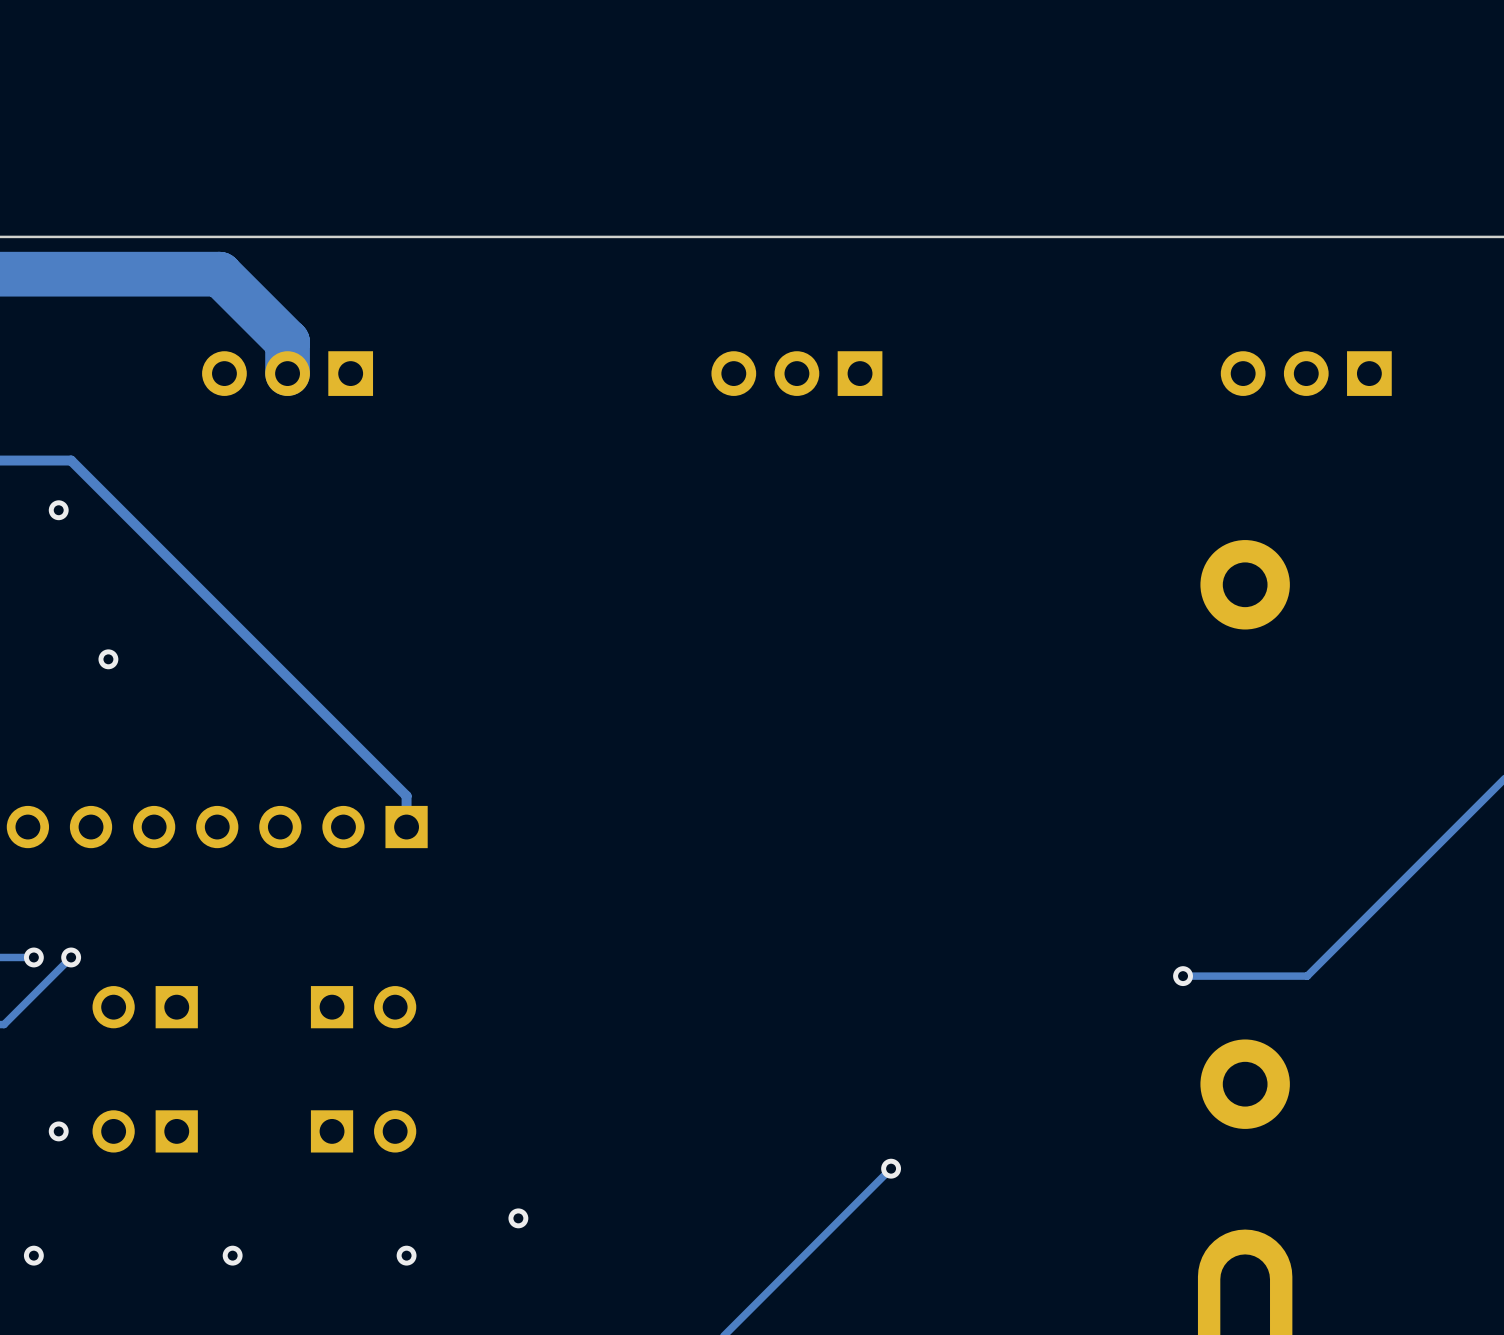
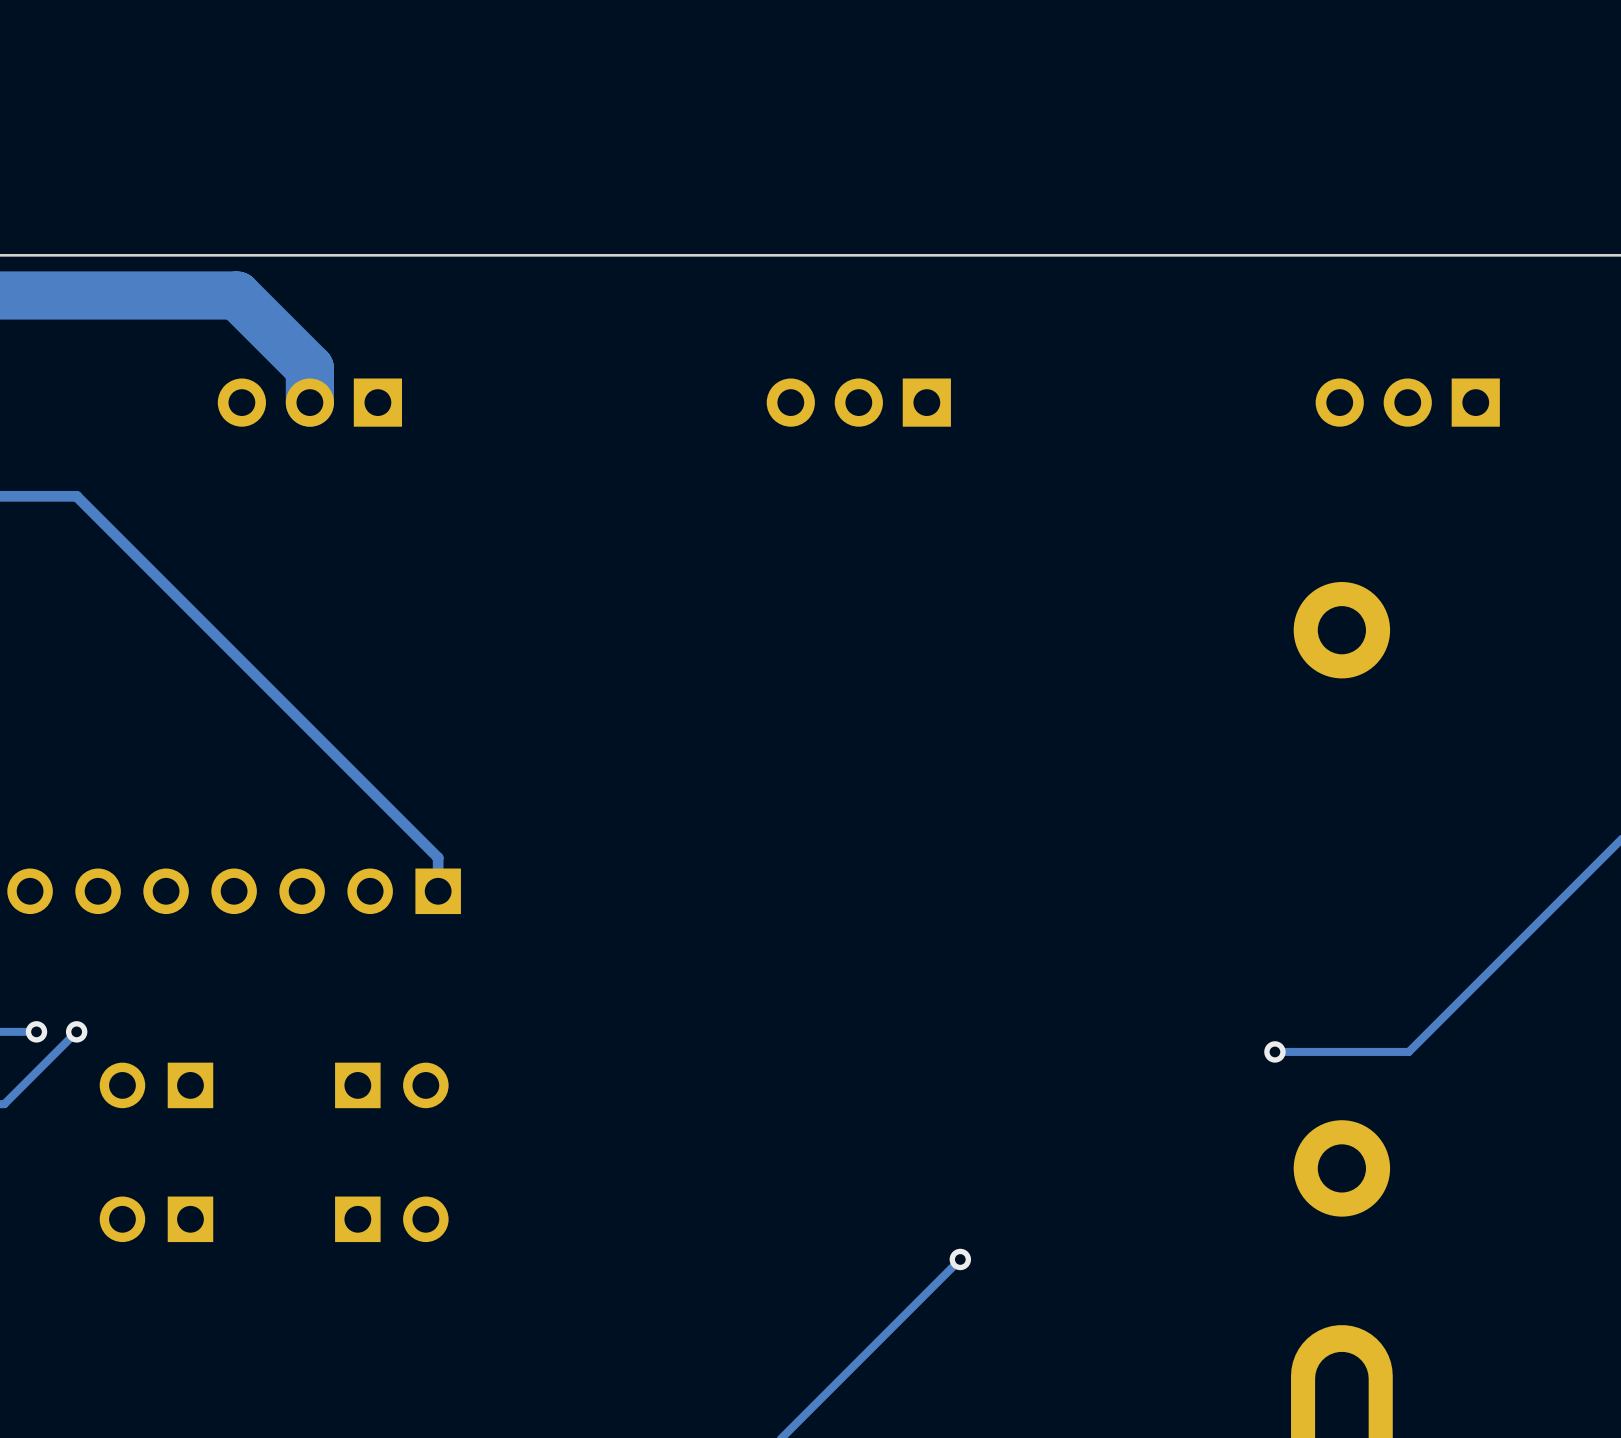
via: (58, 510) -> none
via: (108, 659) -> none
via: (58, 1131) -> none
via: (518, 1218) -> none
via: (33, 1255) -> none
via: (232, 1255) -> none
via: (406, 1255) -> none

